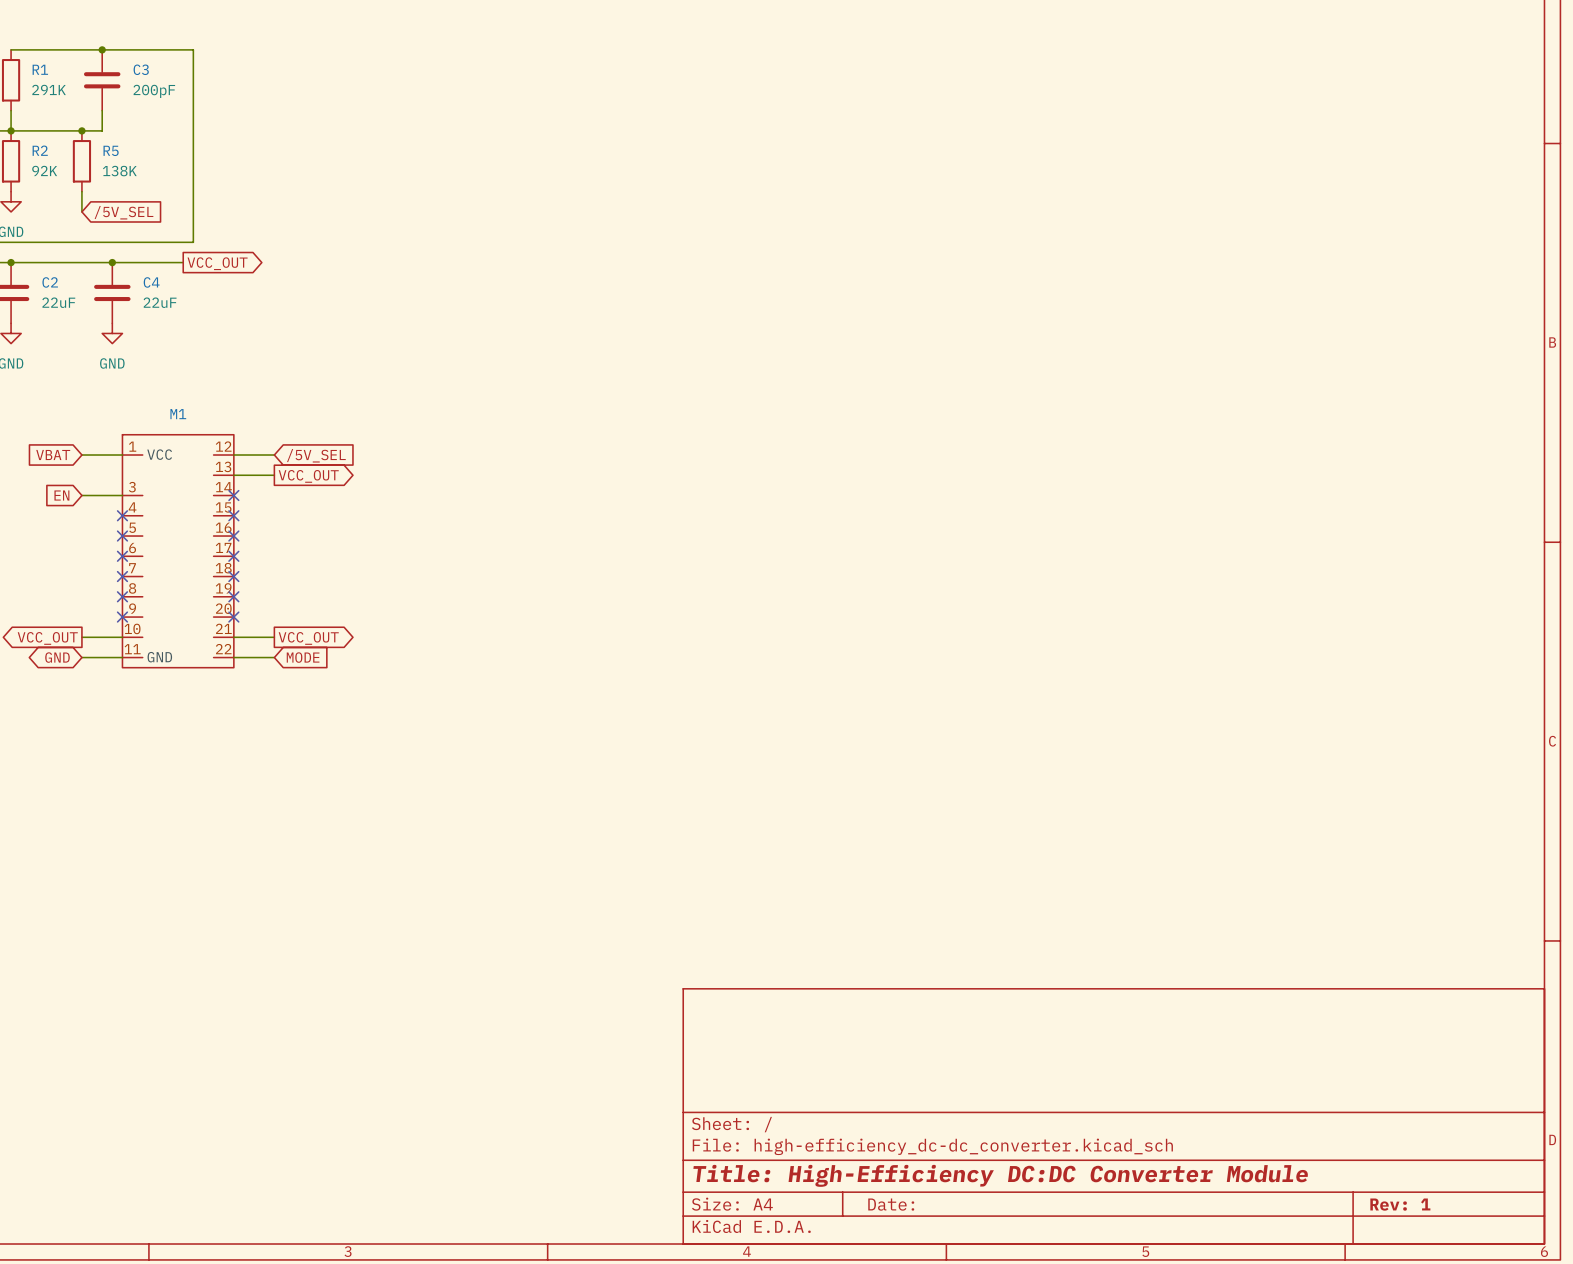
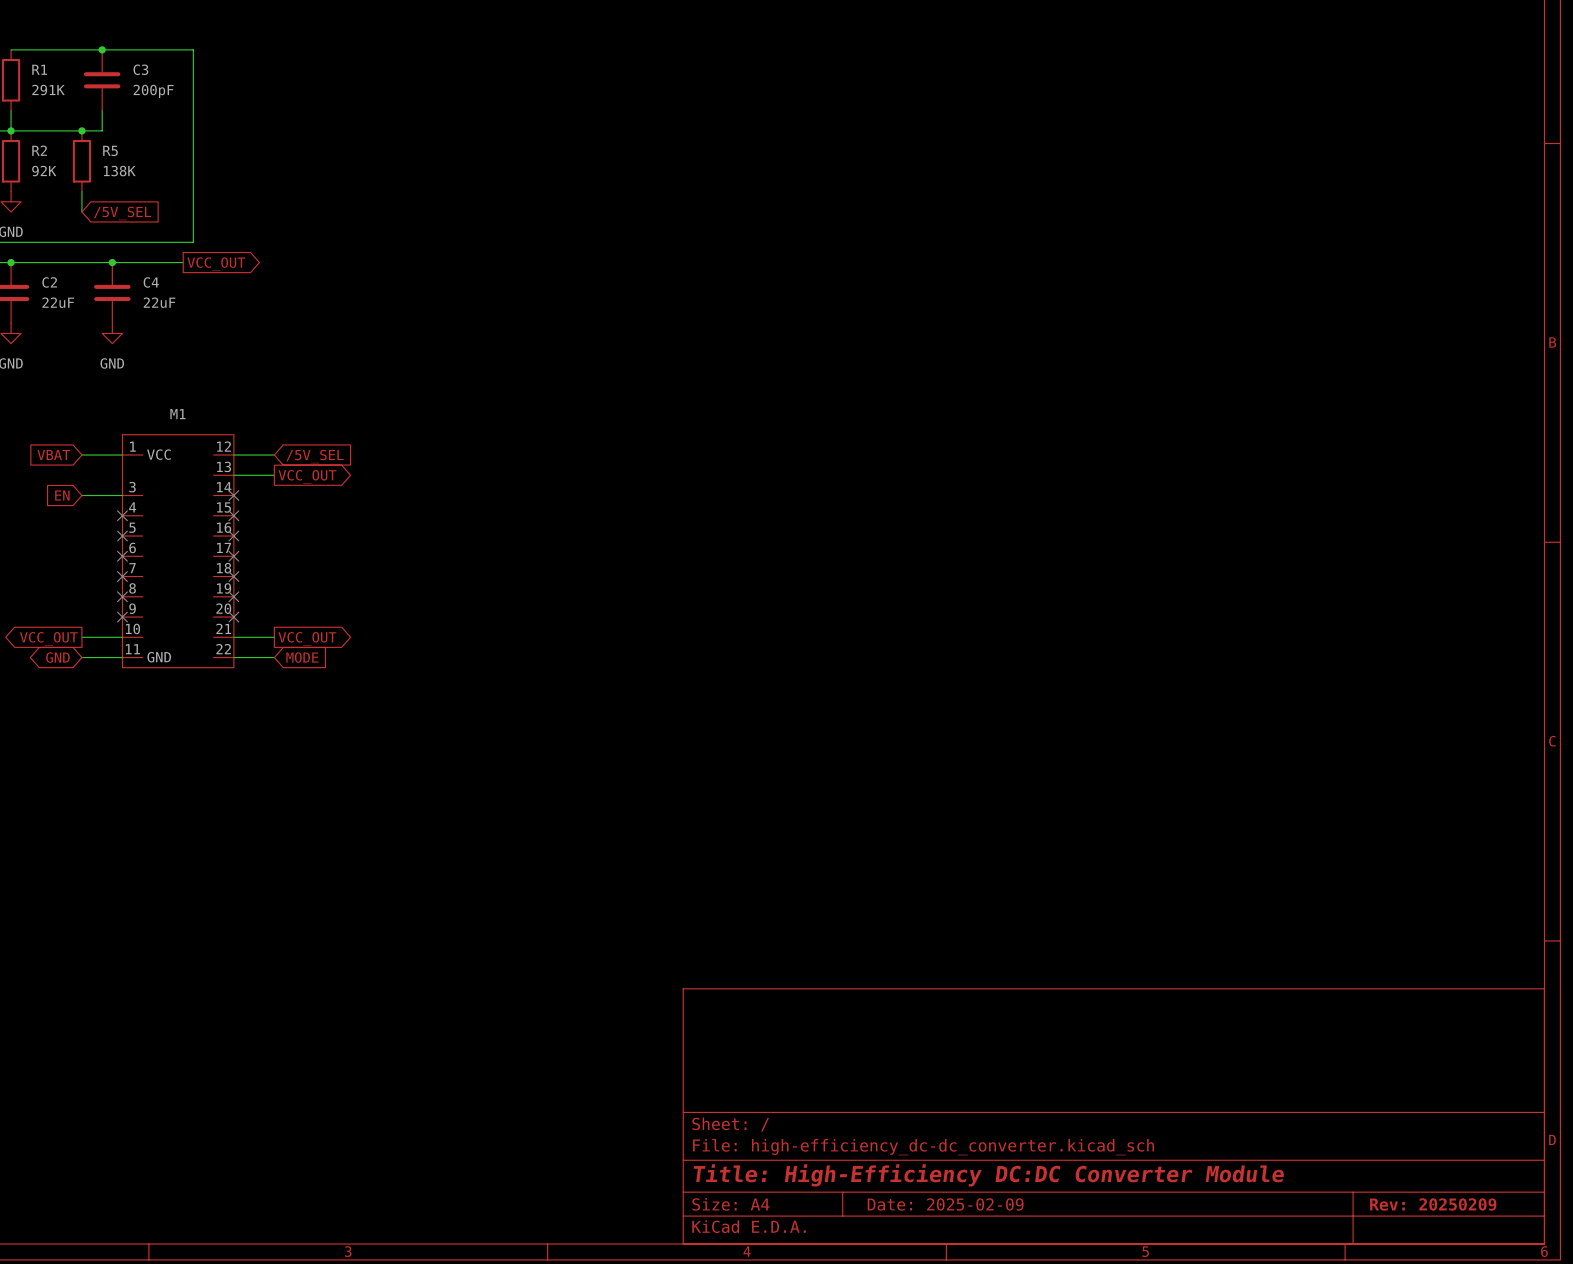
title block: Date: (891, 1204) -> Date: 2025-02-09 (945, 1204)
title block: Rev: 1 (1400, 1204) -> Rev: 20250209 (1433, 1204)

